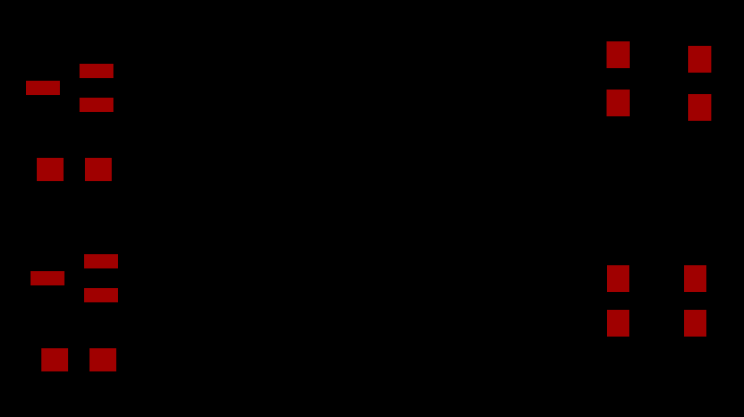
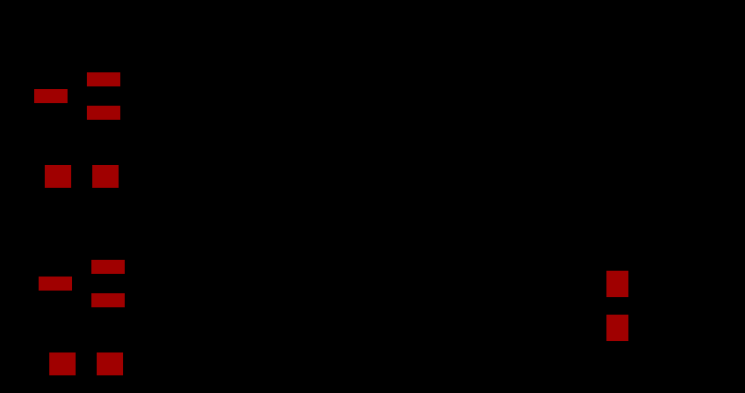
part: (618, 78) -> none
part: (699, 83) -> none
part: (695, 300) -> none

